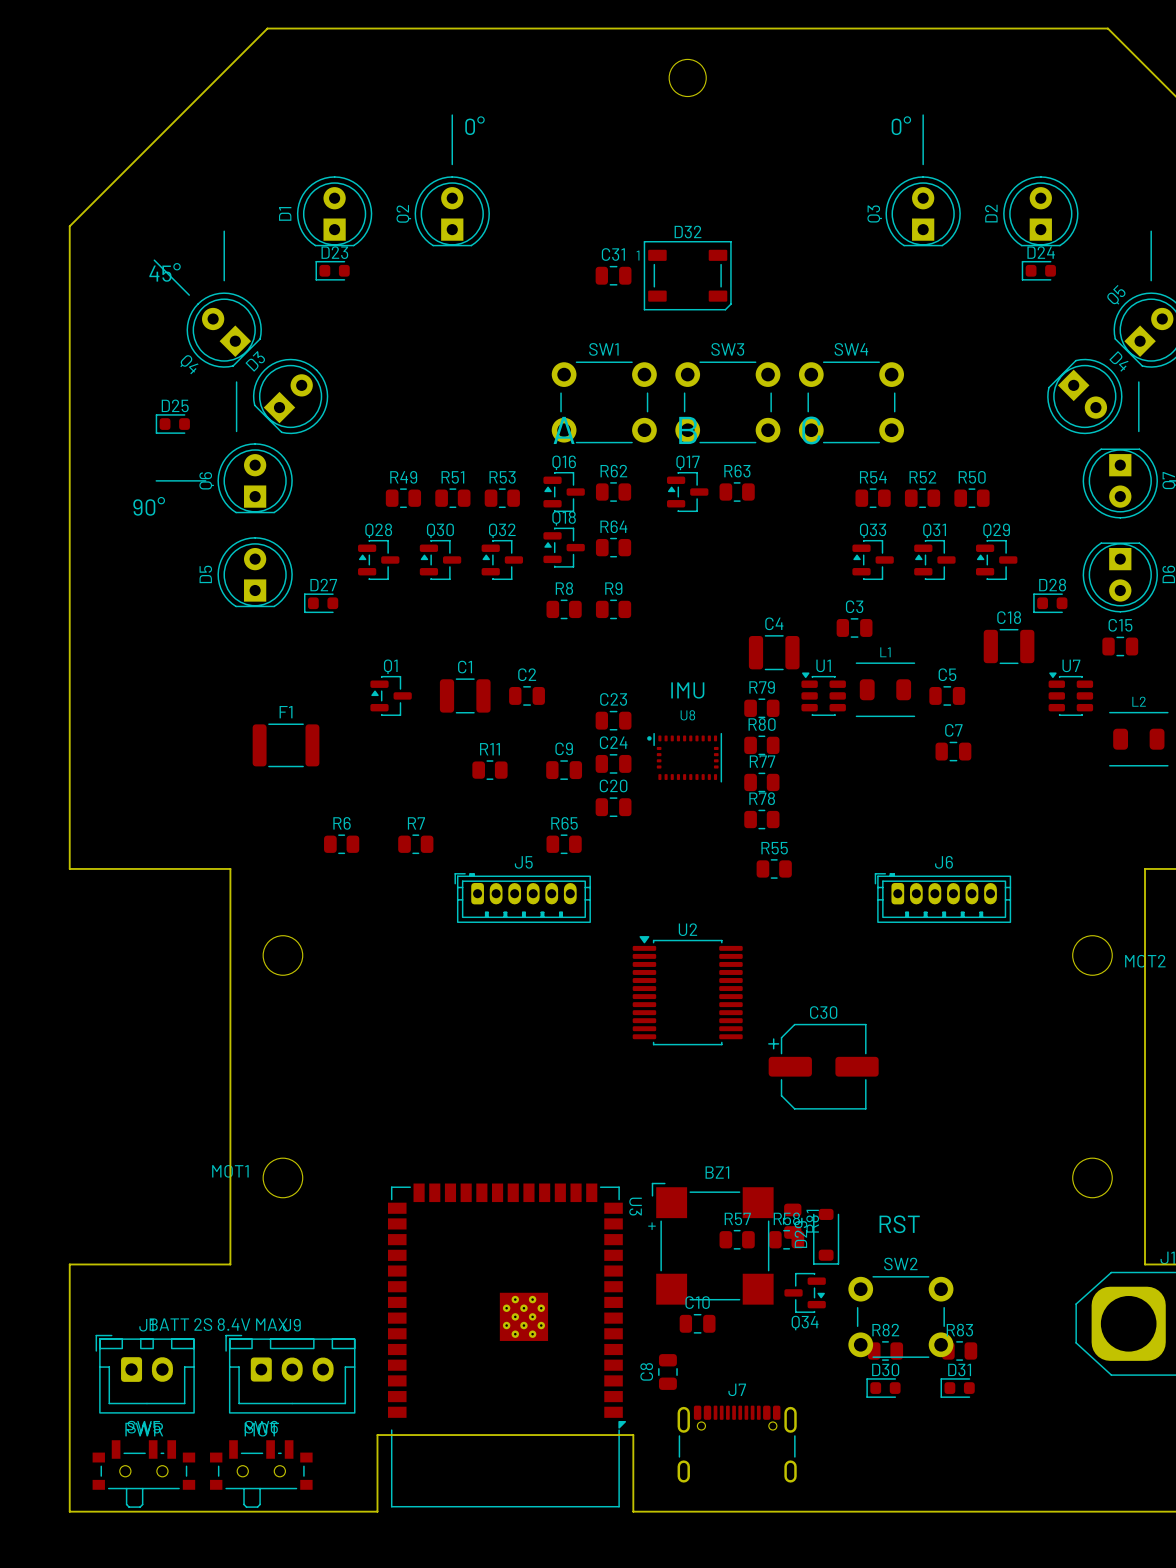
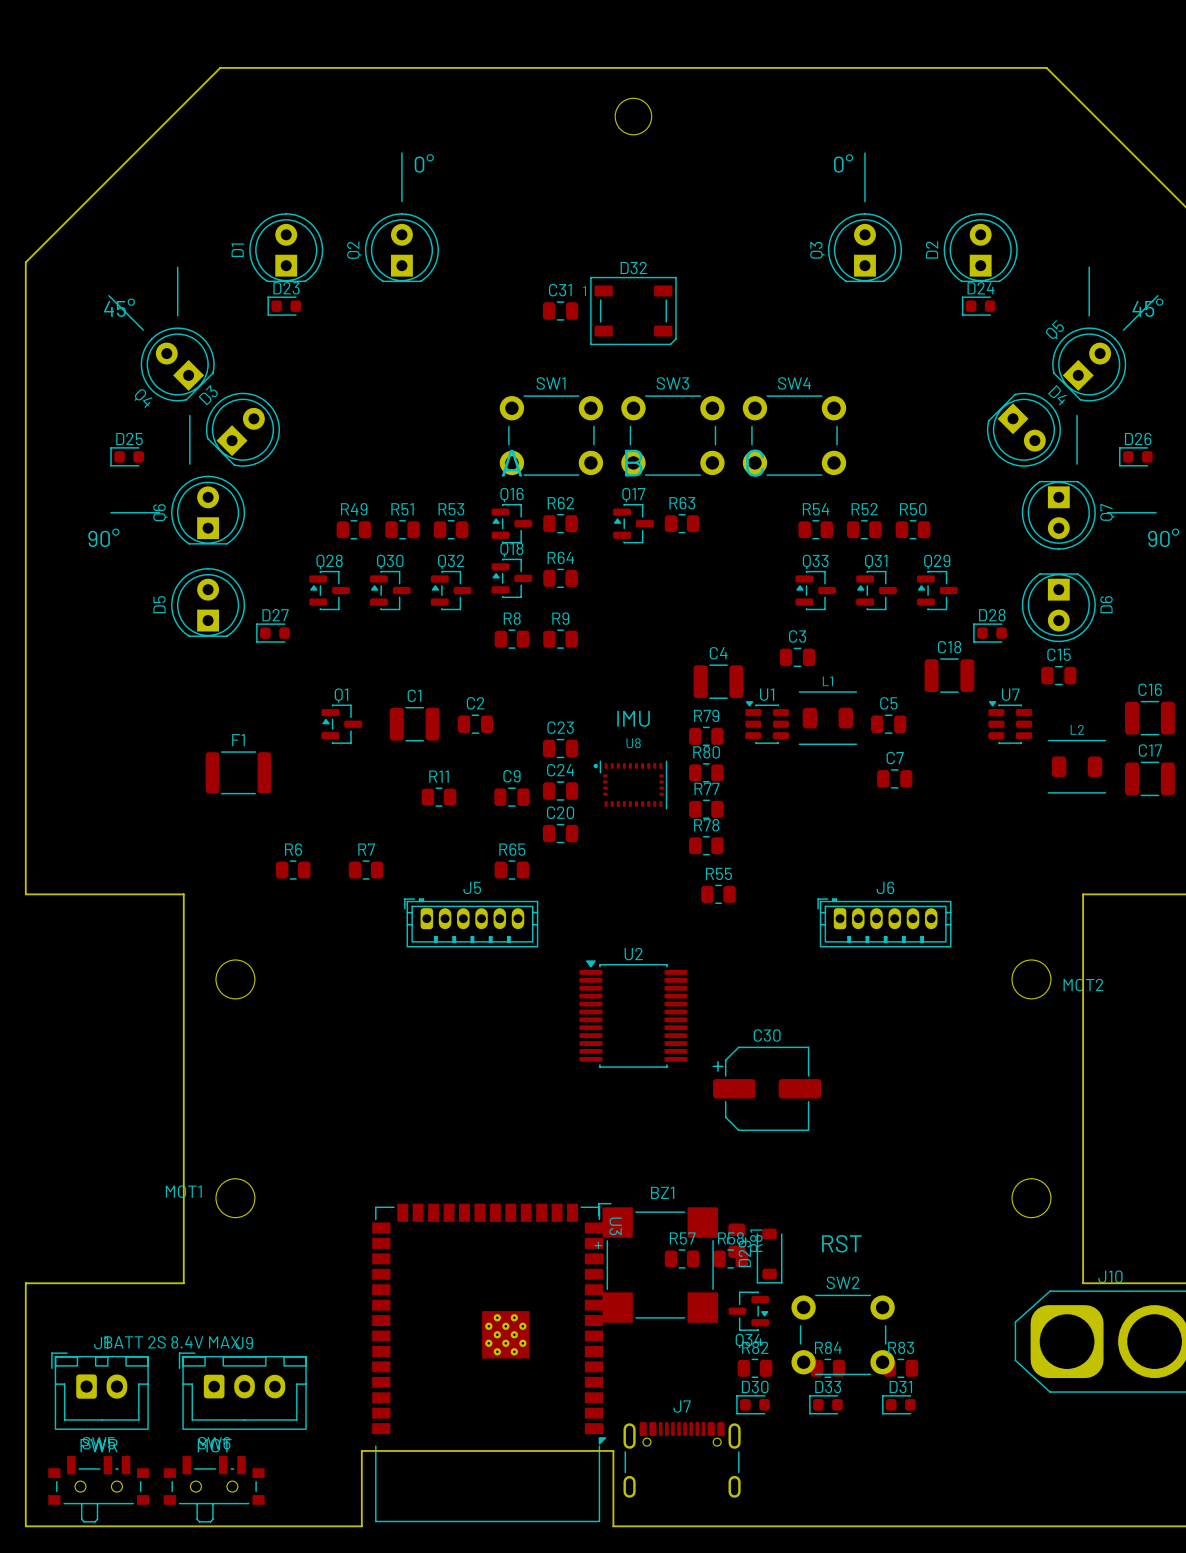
C10: (697, 1323) -> none
R82 name: R82 (885, 1330) -> R84 (828, 1347)
U3 position: (507, 1345) -> (489, 1362)
R82: none -> (754, 1368)
D30 name: D30 (885, 1369) -> D33 (828, 1387)
C8: (667, 1372) -> none
D30: none -> (753, 1404)
board edge: (411, 1435) (377, 1435) (377, 1511) -> (361, 1450) (361, 1526) (328, 1526)
board edge: (633, 1435) (633, 1511) (667, 1511) -> (579, 1450) (613, 1450) (613, 1526)

